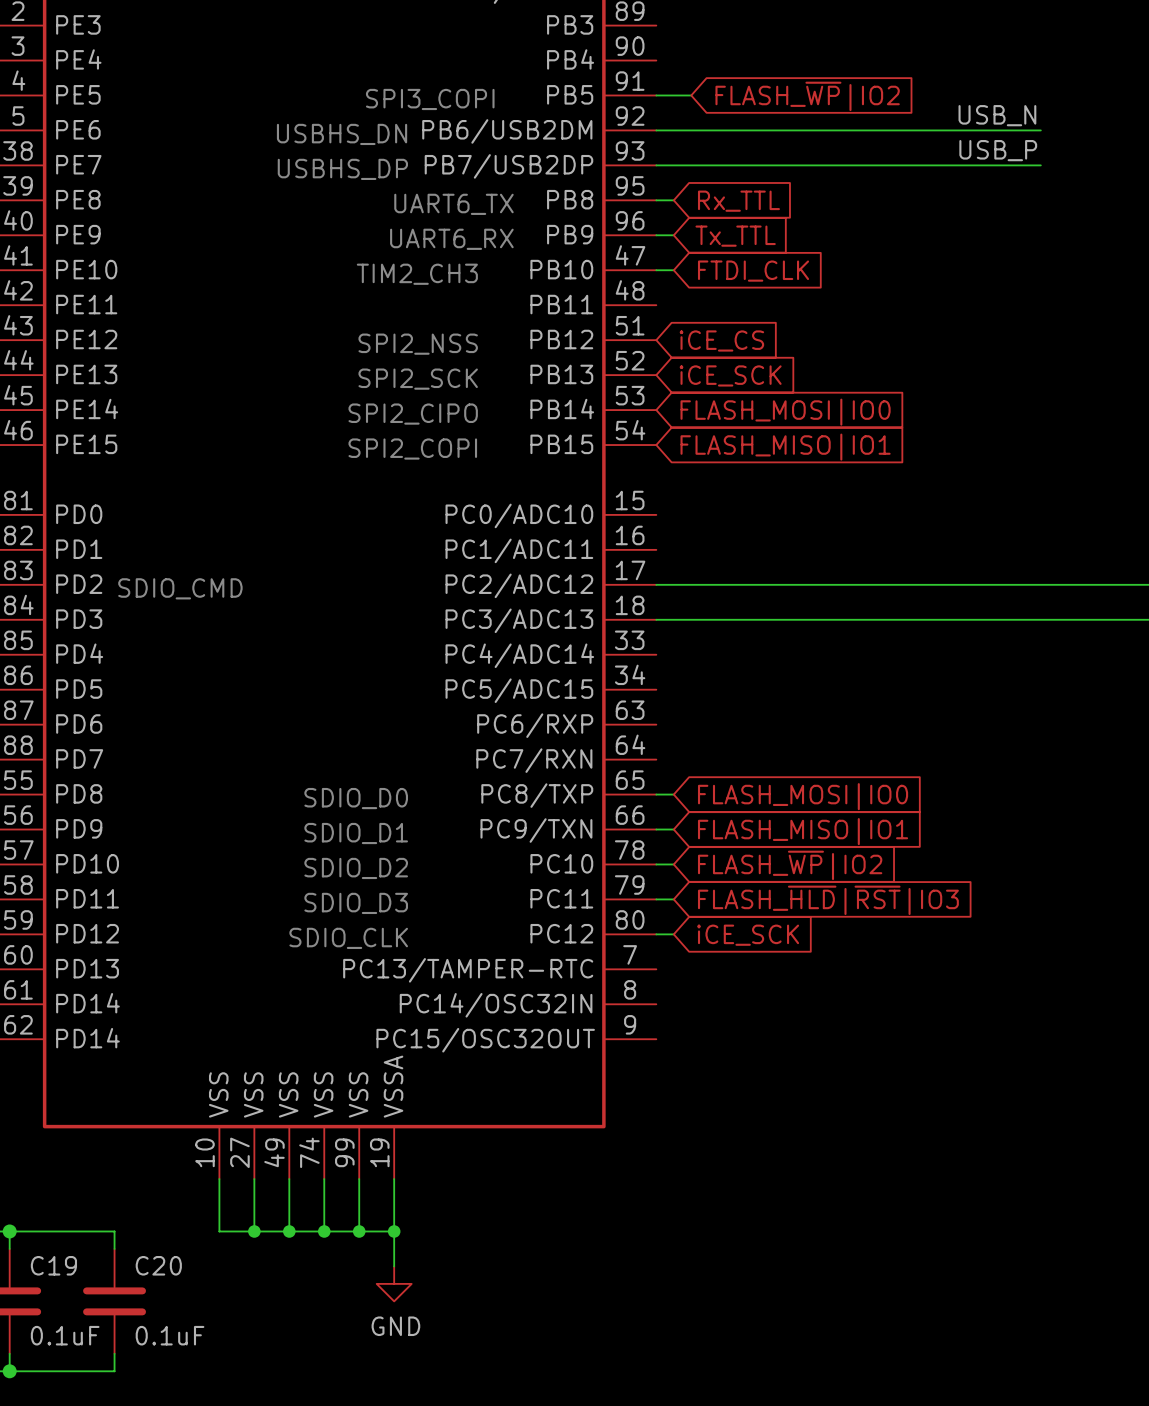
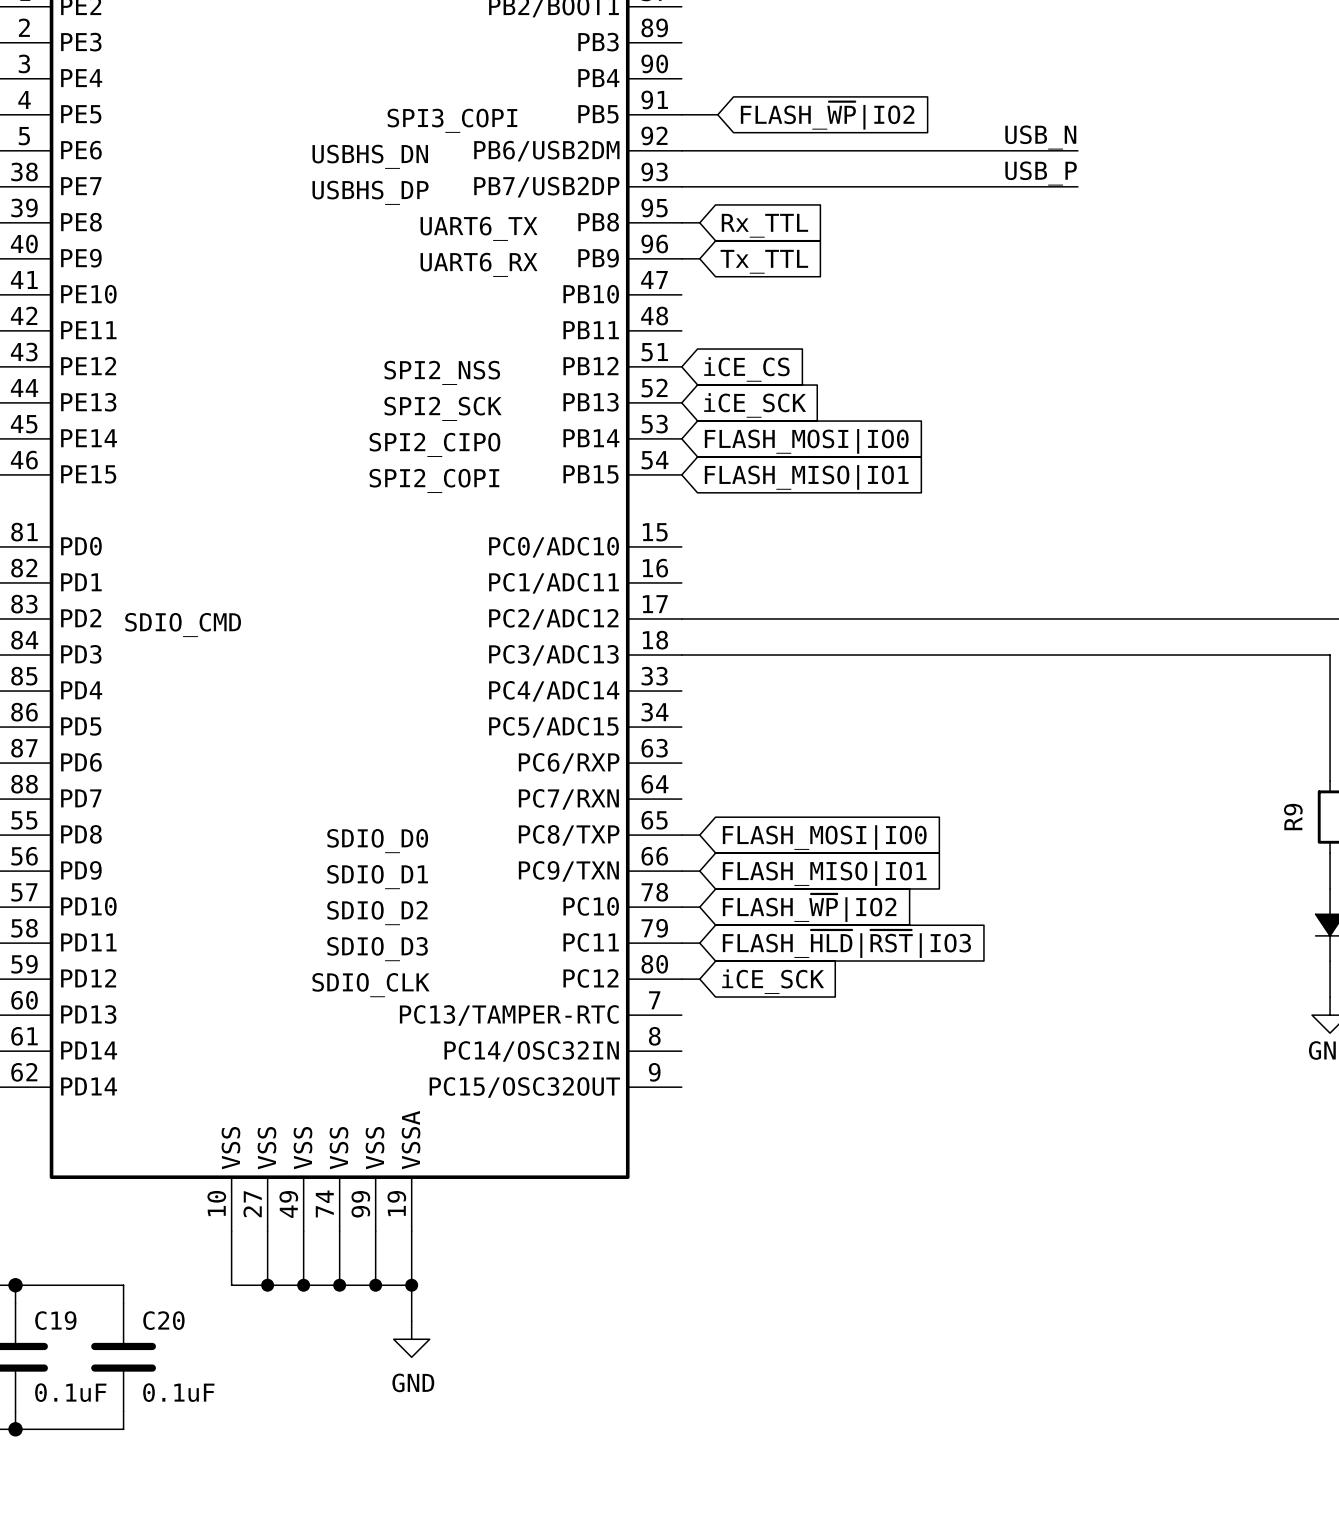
wire: (656, 270) (673, 270) -> none
global label: FTDI_CLK (753, 271) -> none
text: TIM2_CH3 (417, 274) -> none

